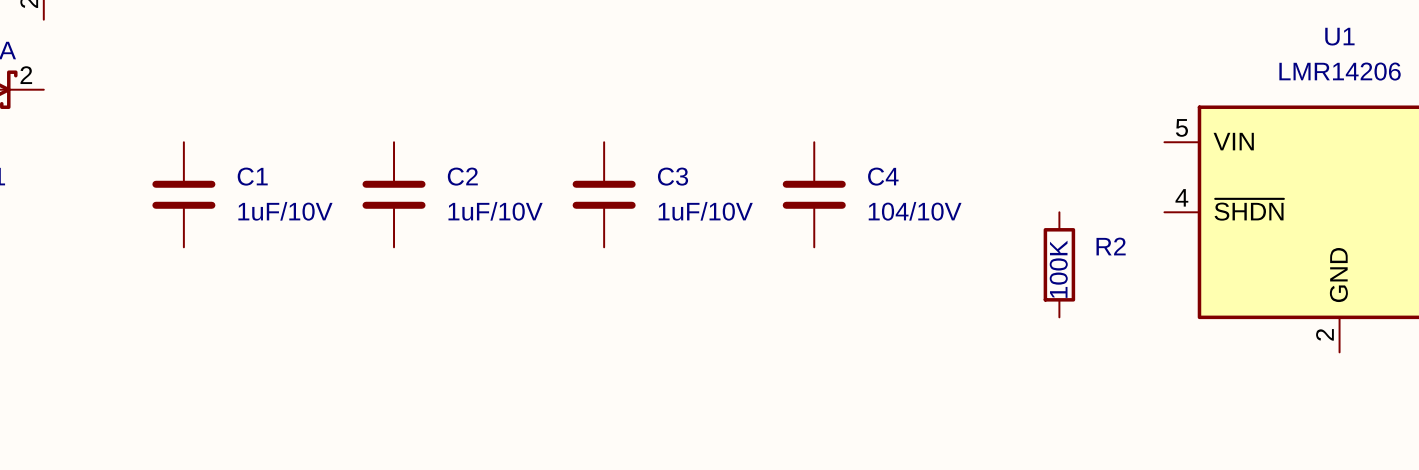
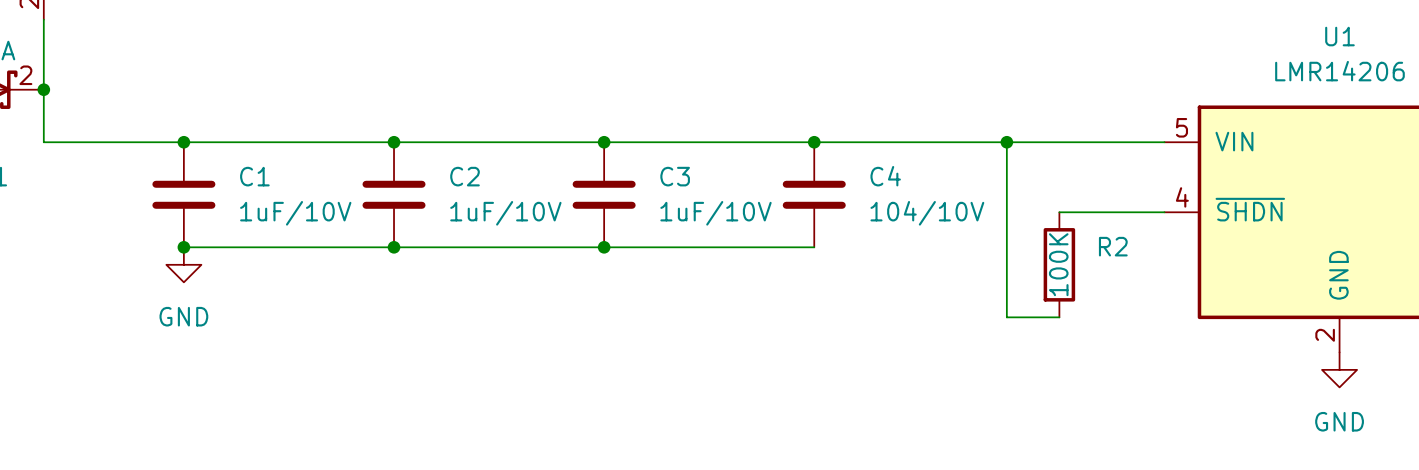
wire: none -> (43, 19) (43, 142) (1164, 142)
junction: none -> (43, 89)
junction: none -> (183, 142)
junction: none -> (394, 142)
junction: none -> (604, 142)
junction: none -> (814, 142)
wire: none -> (1006, 142) (1006, 317) (1059, 317)
junction: none -> (1006, 142)
wire: none -> (1059, 212) (1164, 212)
wire: none -> (183, 247) (814, 247)
junction: none -> (183, 247)
junction: none -> (394, 247)
junction: none -> (604, 247)
power symbol: none -> GND (183, 264)
power symbol: none -> GND (1339, 369)

